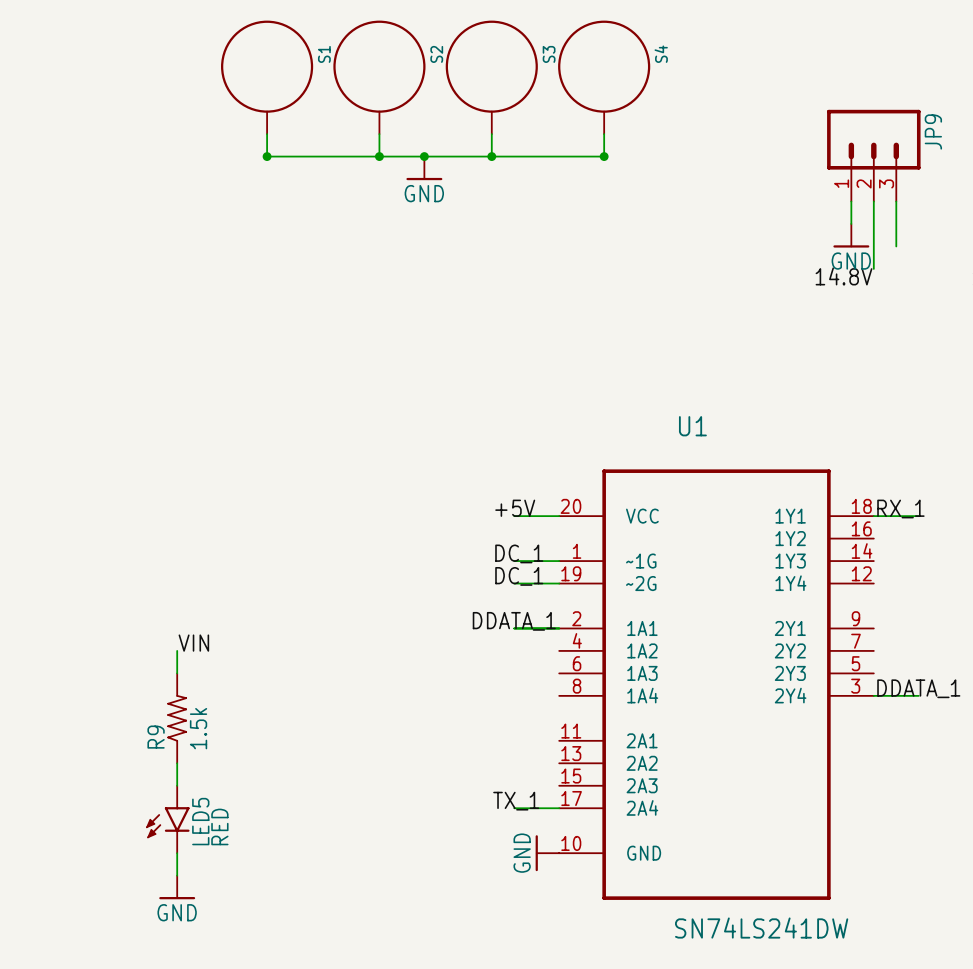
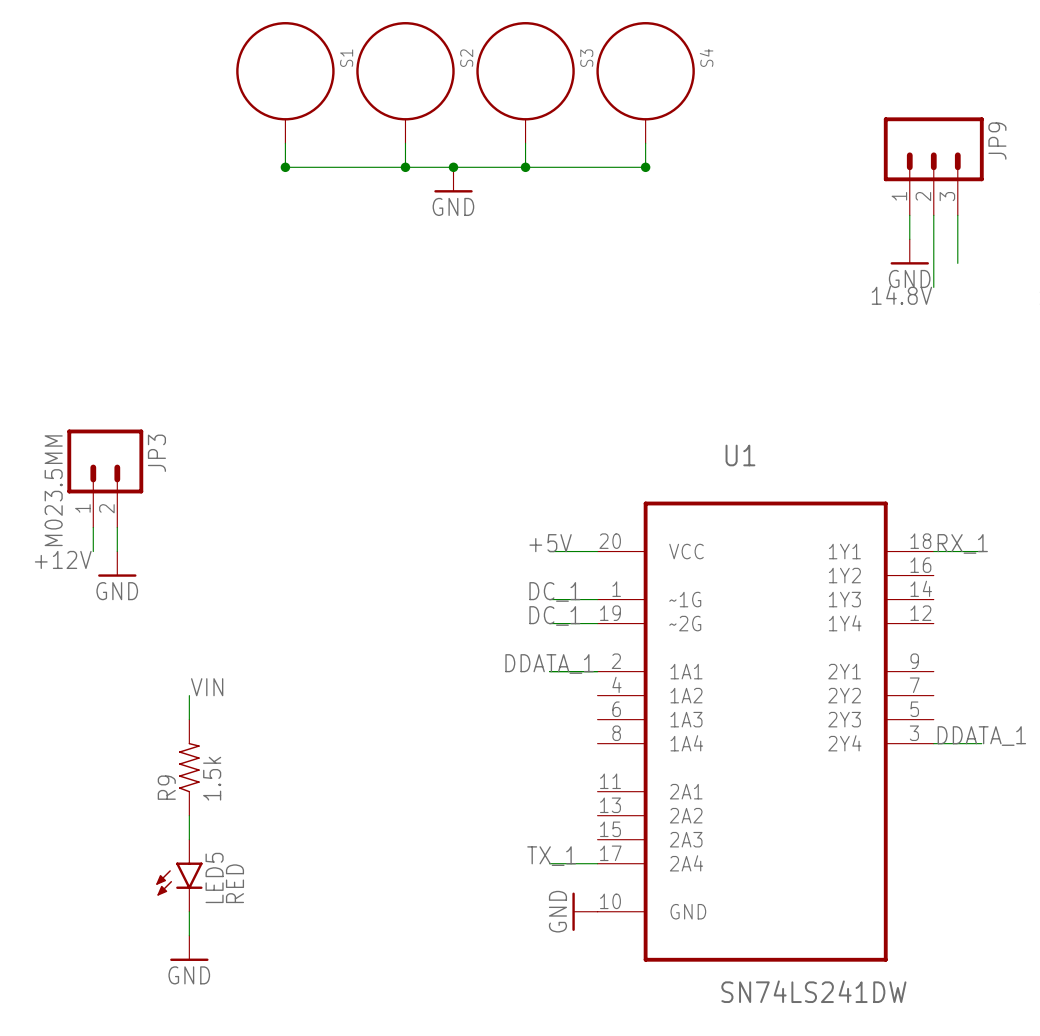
JP3: none -> M023.5MM (105, 478)
wire: none -> (93, 527) (93, 551)
wire: none -> (117, 527) (117, 551)
label: none -> +12V (63, 559)
power symbol: none -> GND (117, 564)

